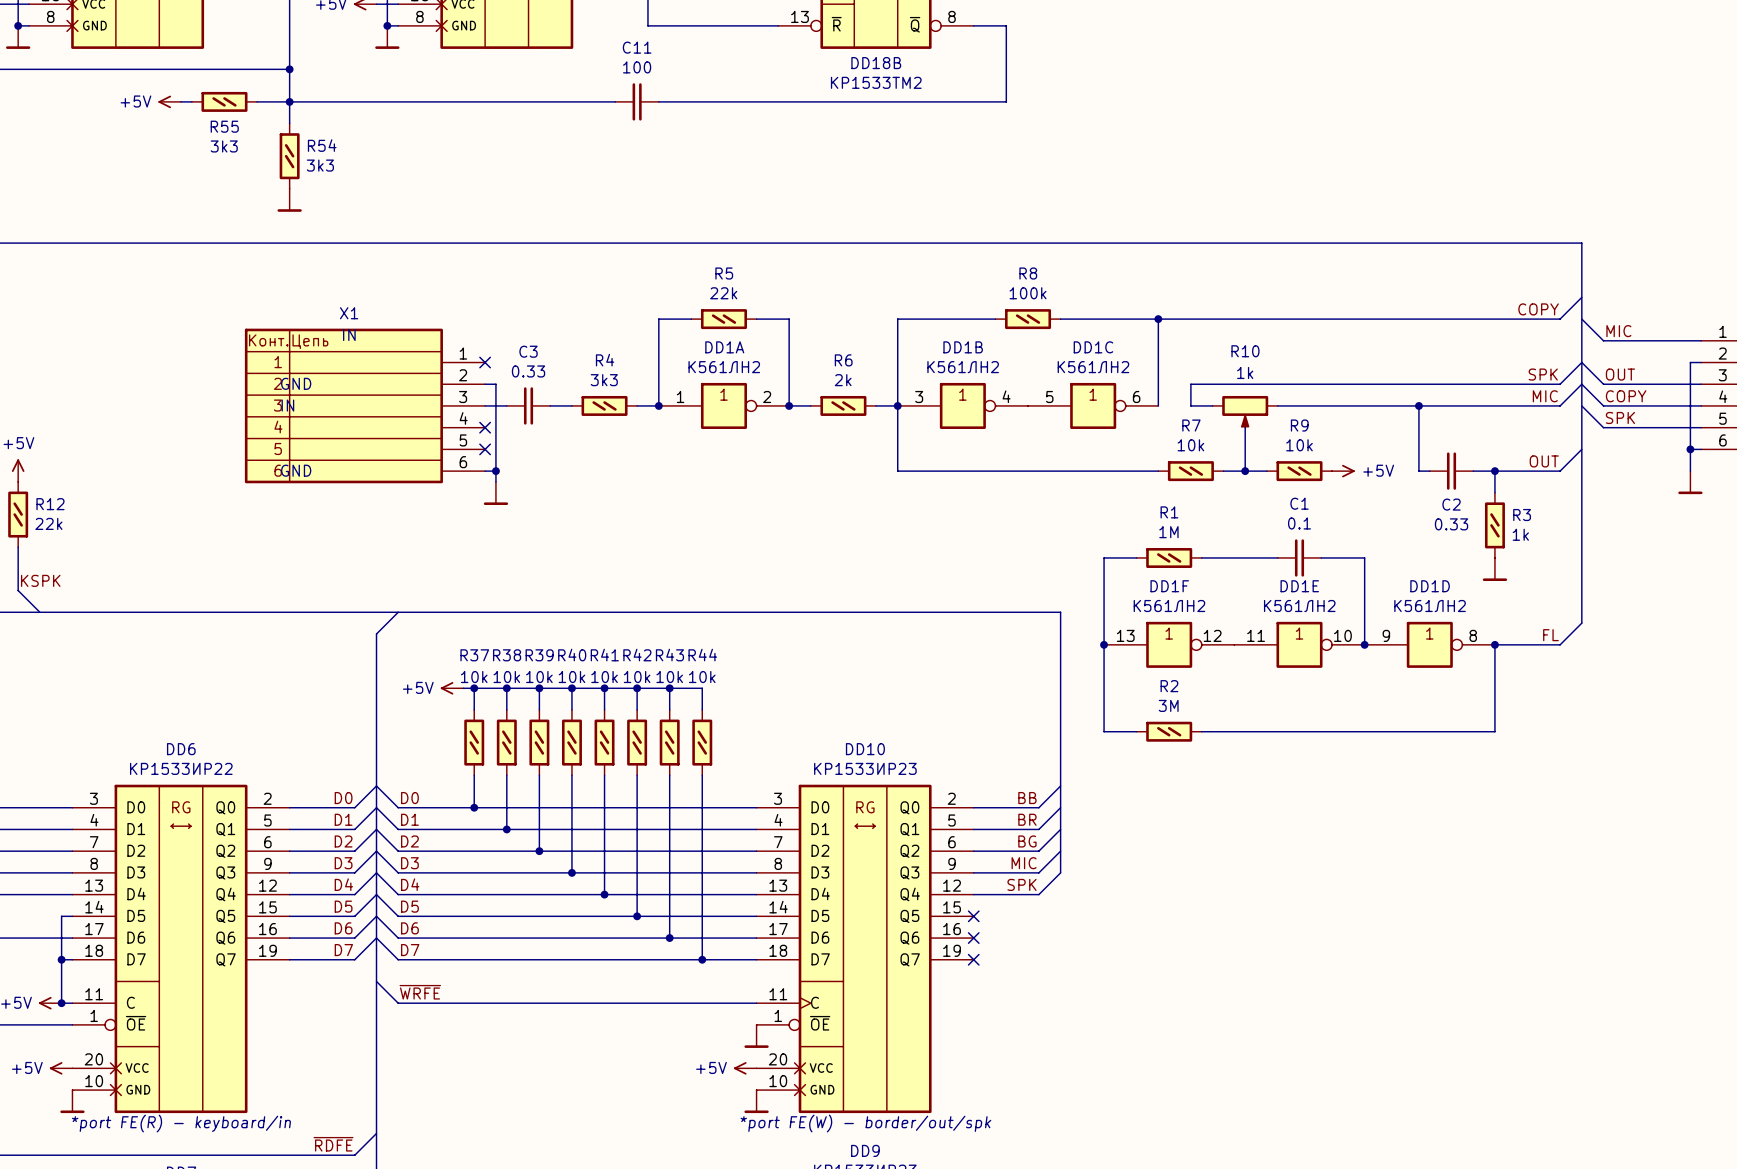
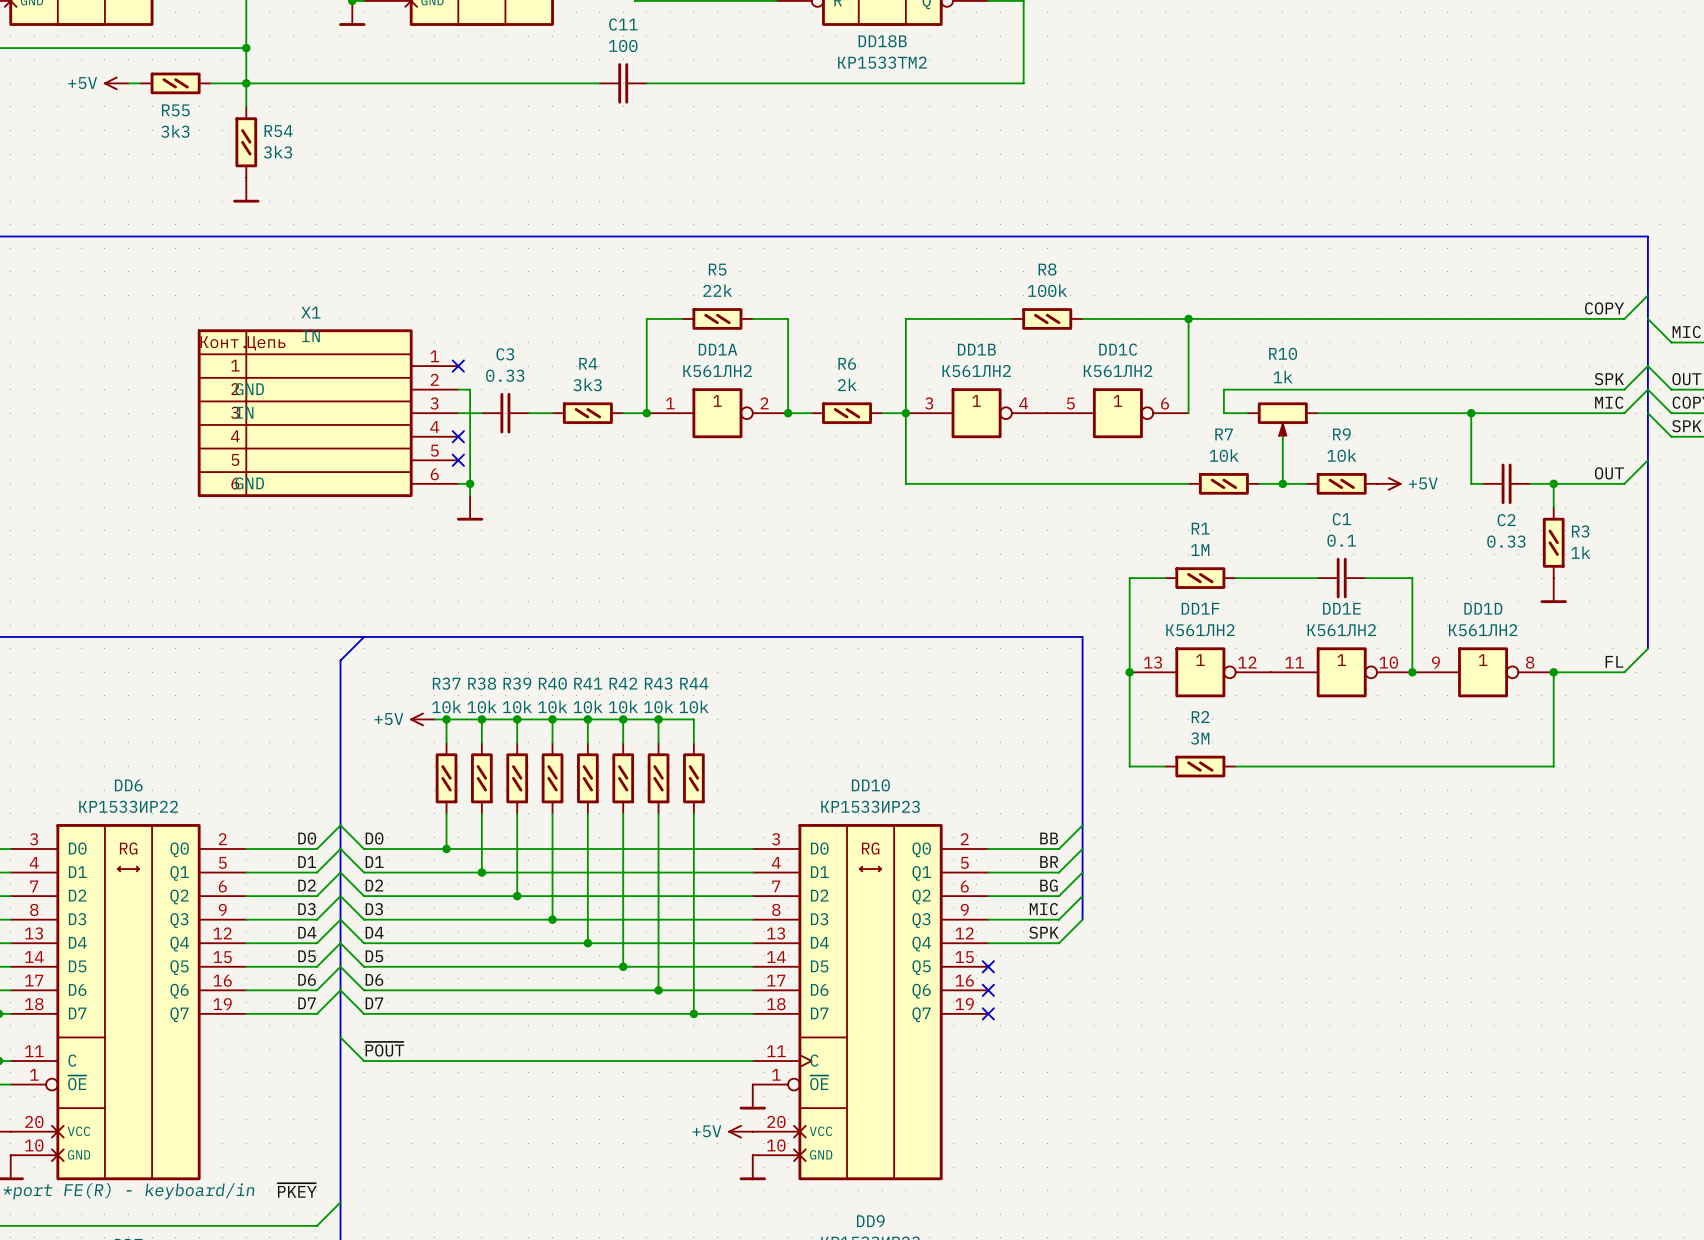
label: ~{WRFE} (420, 992) -> ~{POUT} (384, 1049)
label: none -> ~{PKEY} (297, 1190)
DD10 text: *port FE(W) - border/out/spk (865, 1123) -> none
label: ~{RDFE} (333, 1144) -> none

